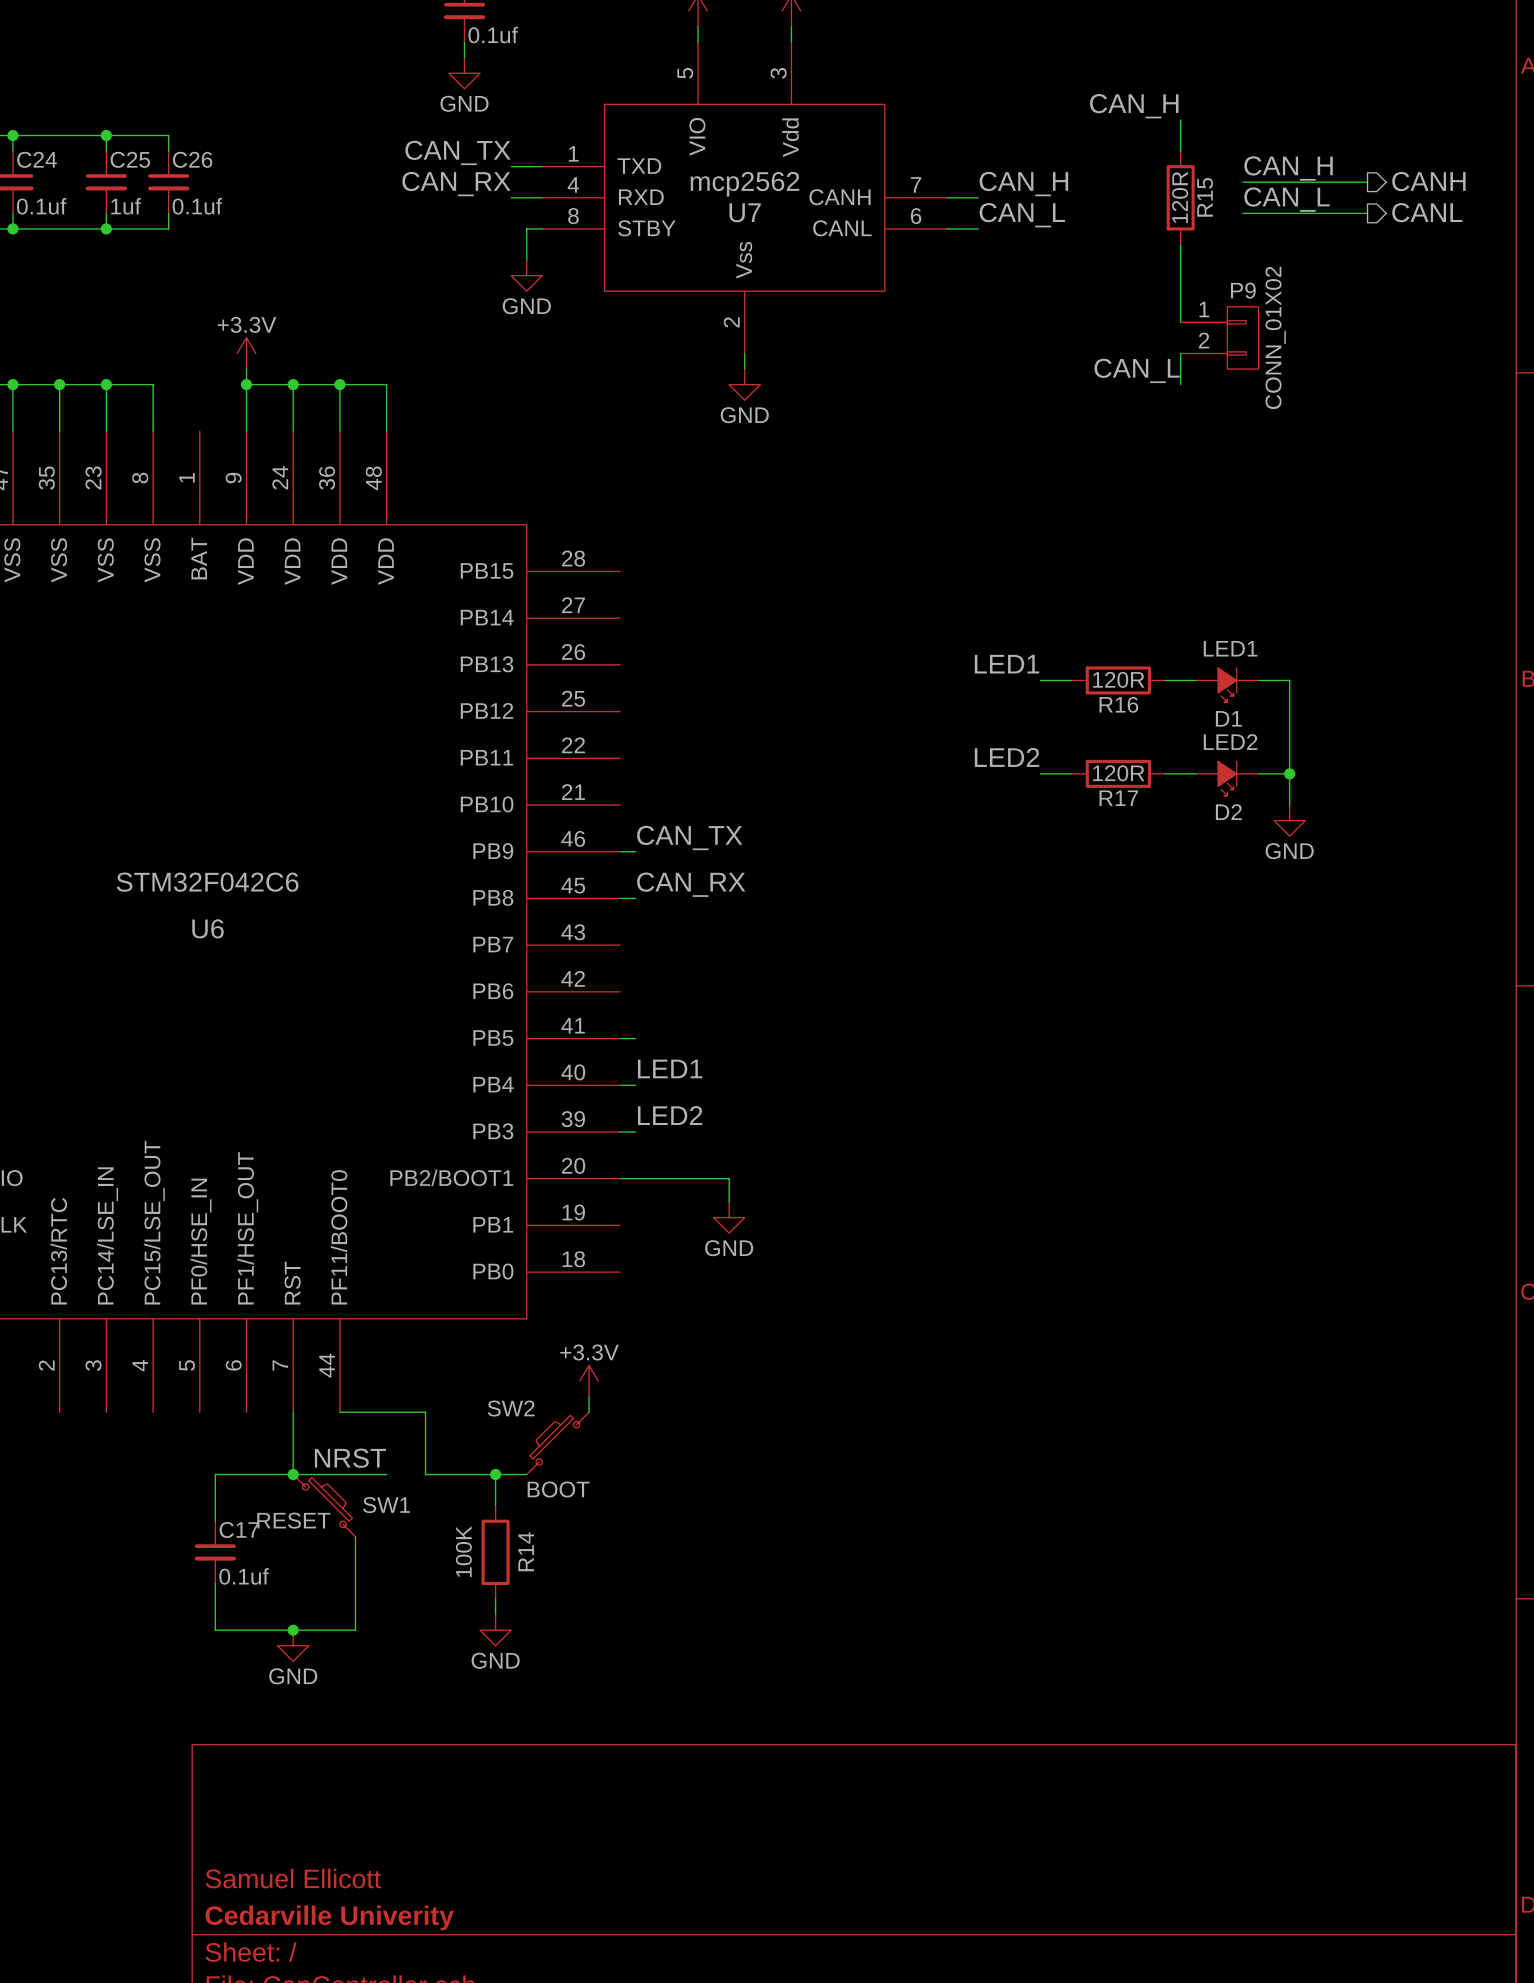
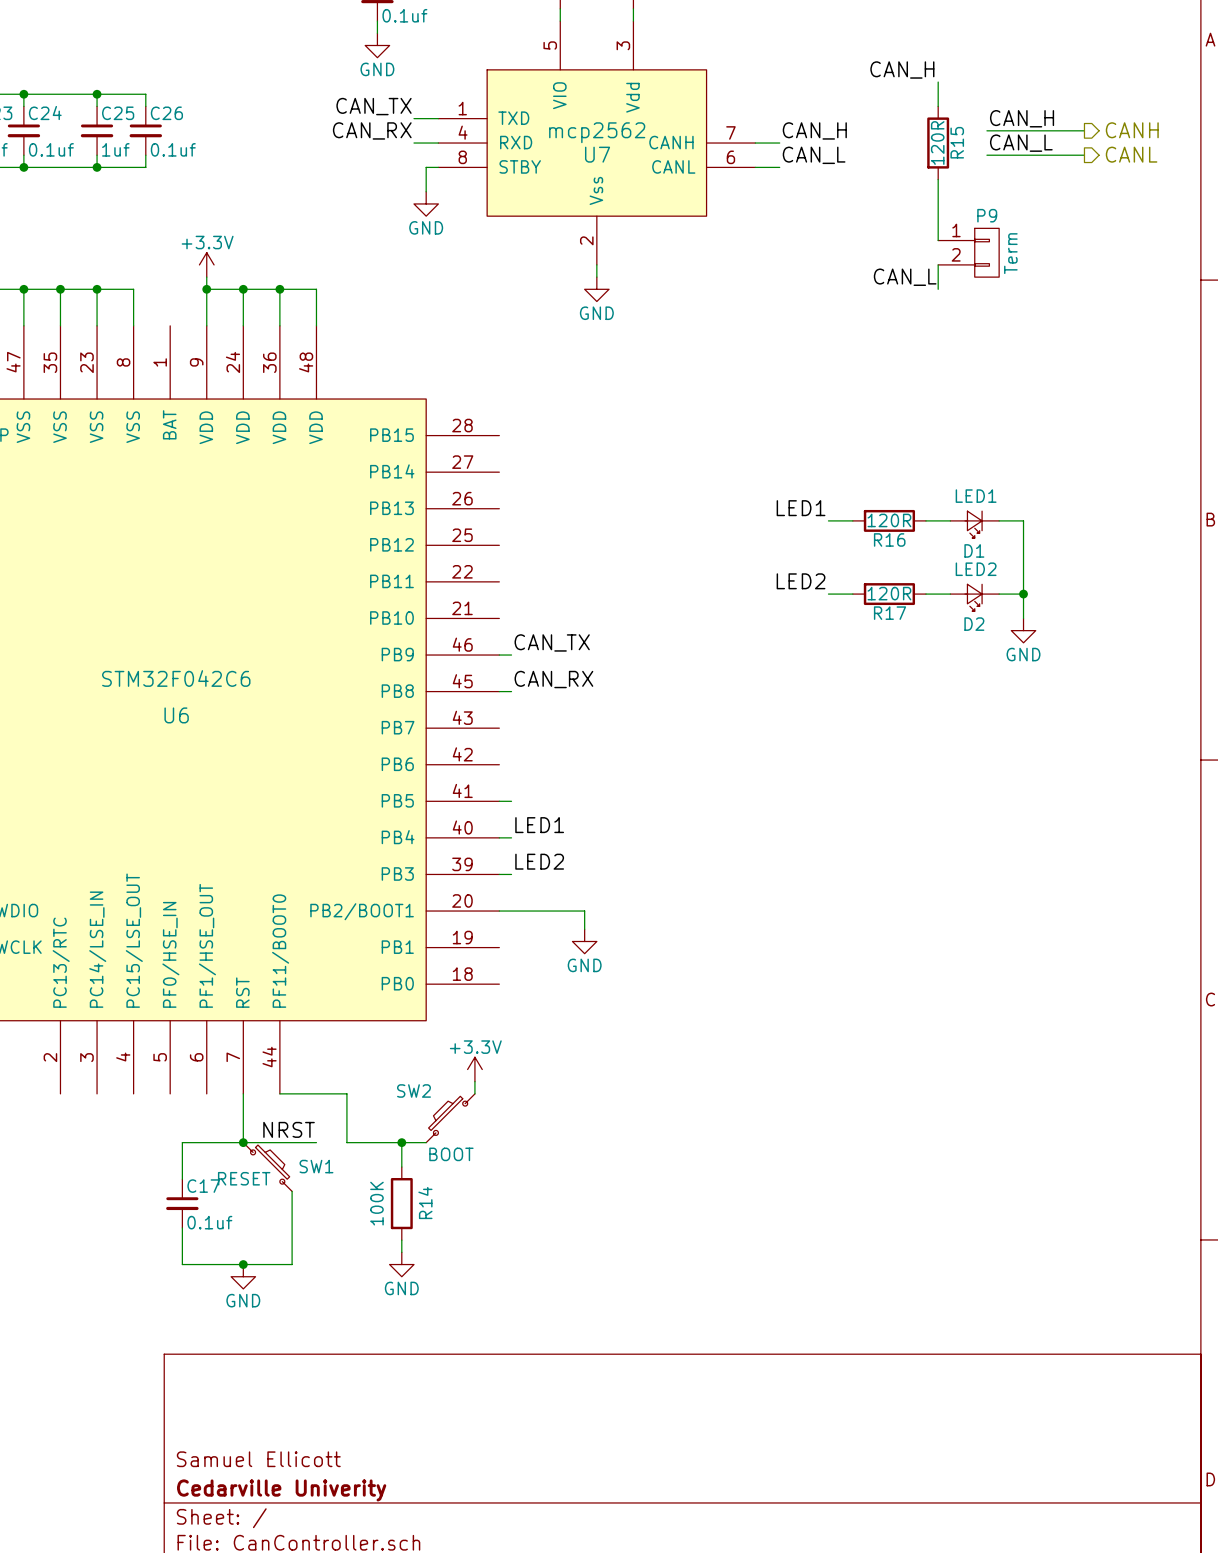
P9 value: CONN_01X02 (1275, 337) -> Term (1010, 253)
D1 symbol: [1196, 668, 1259, 703] -> [950, 511, 1000, 538]
D2 symbol: [1196, 761, 1259, 796] -> [950, 584, 1000, 612]

